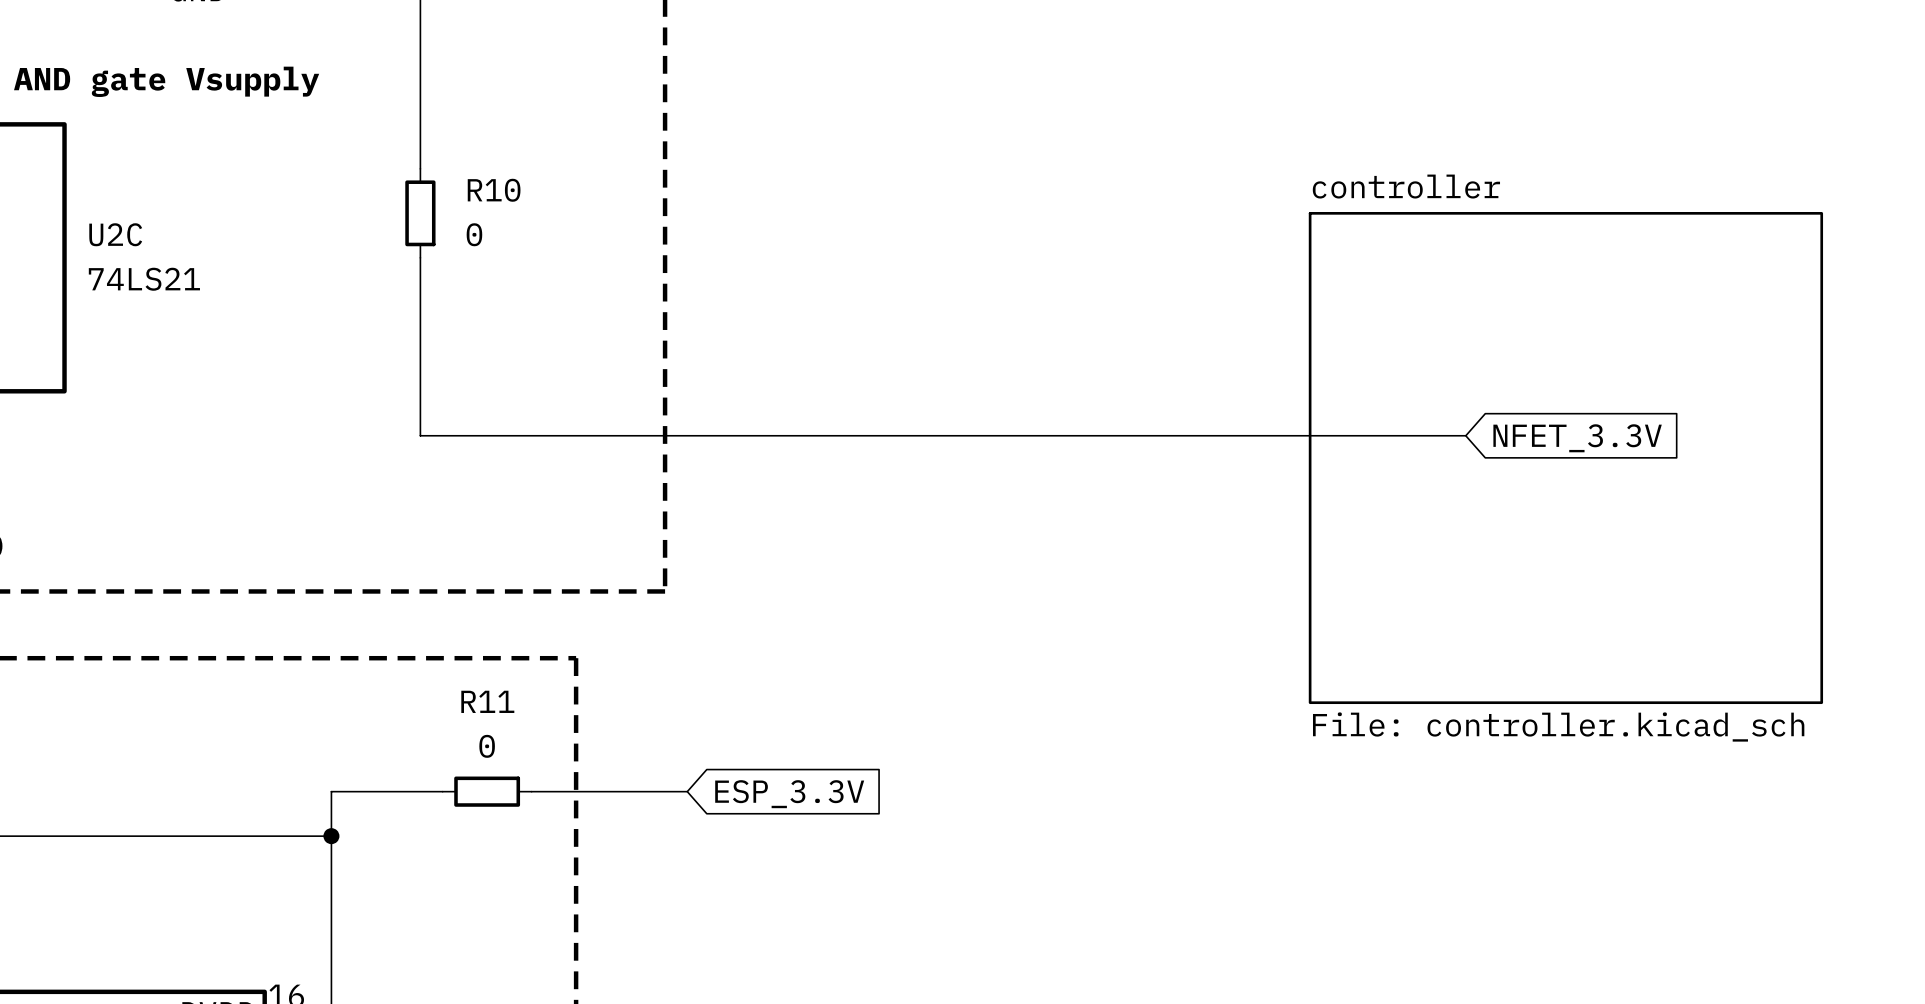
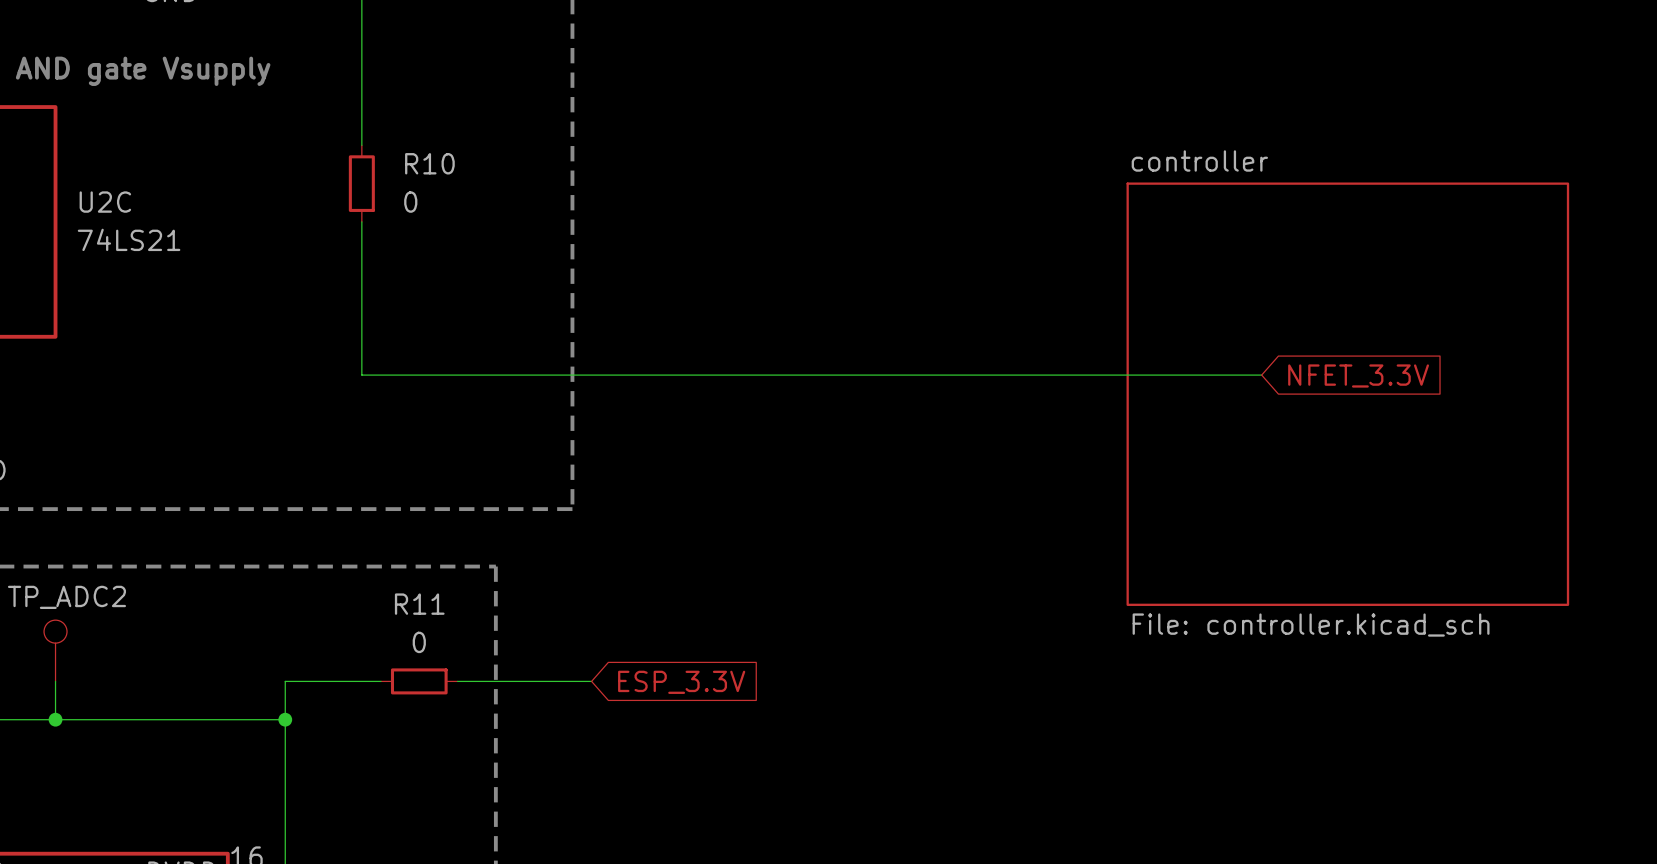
TP_ADC2: none -> (55, 650)
wire: none -> (55, 681) (55, 719)
junction: none -> (55, 719)

